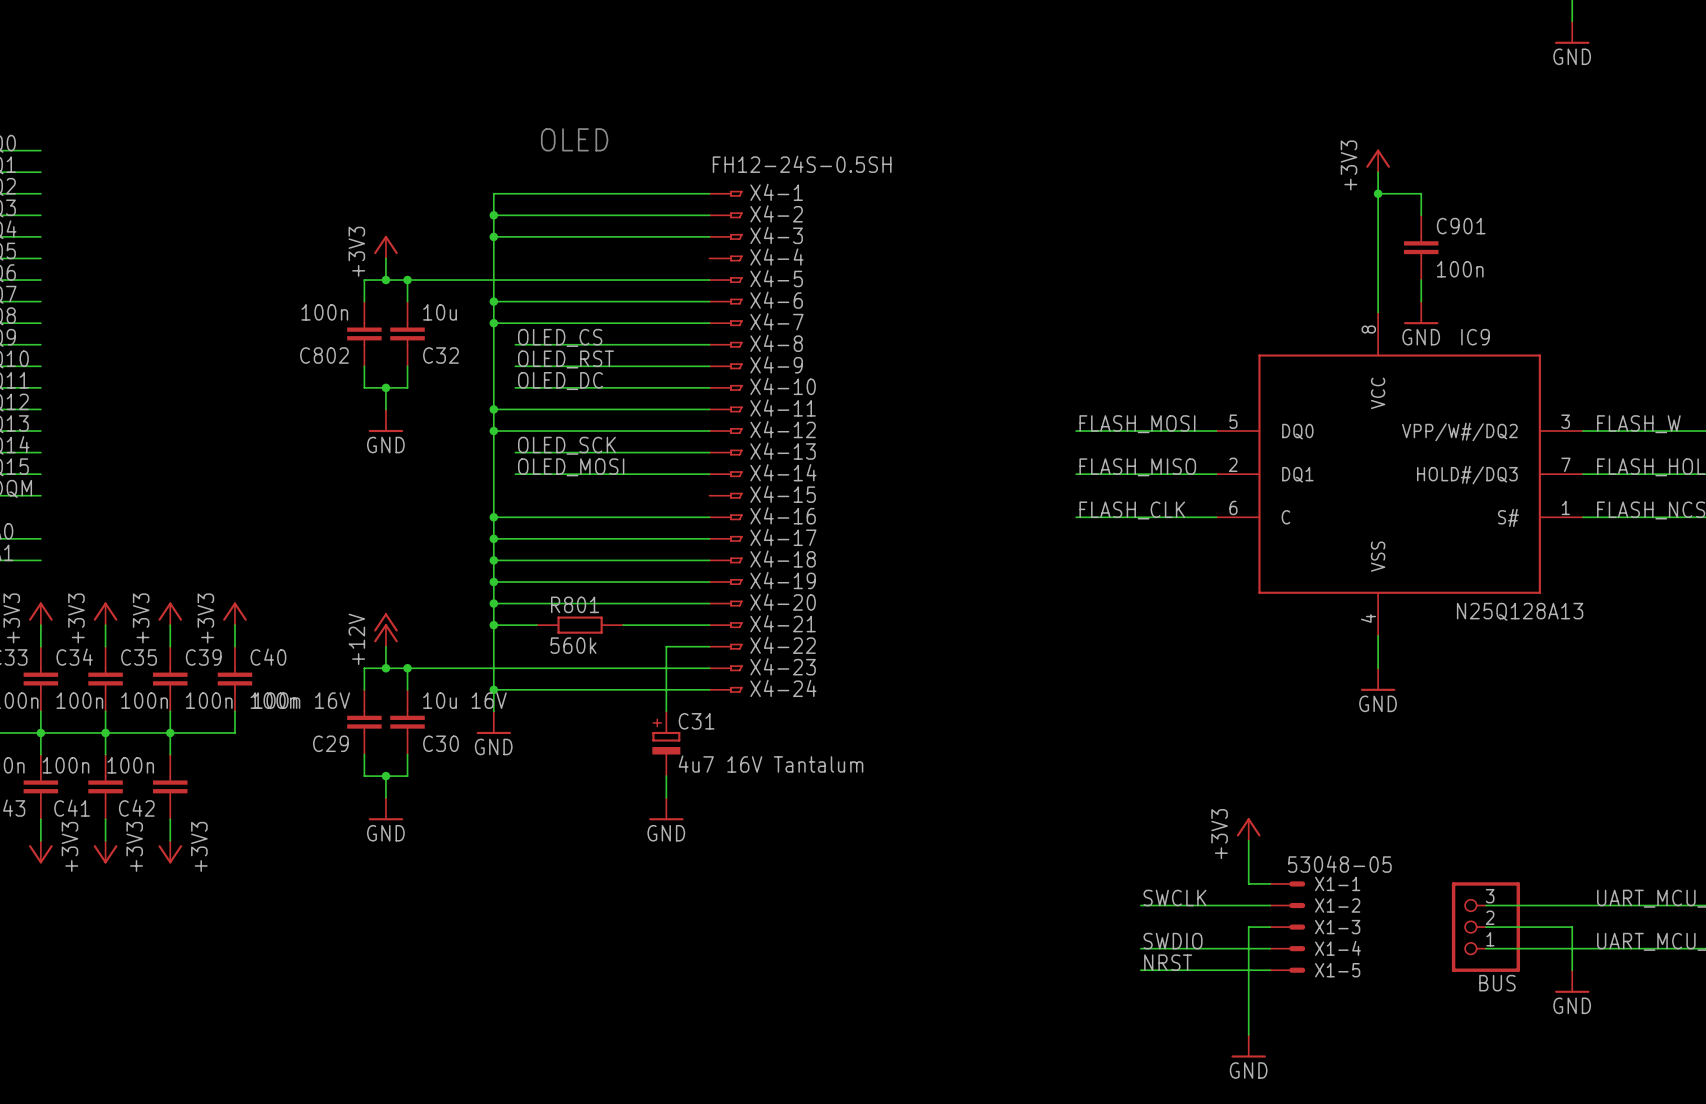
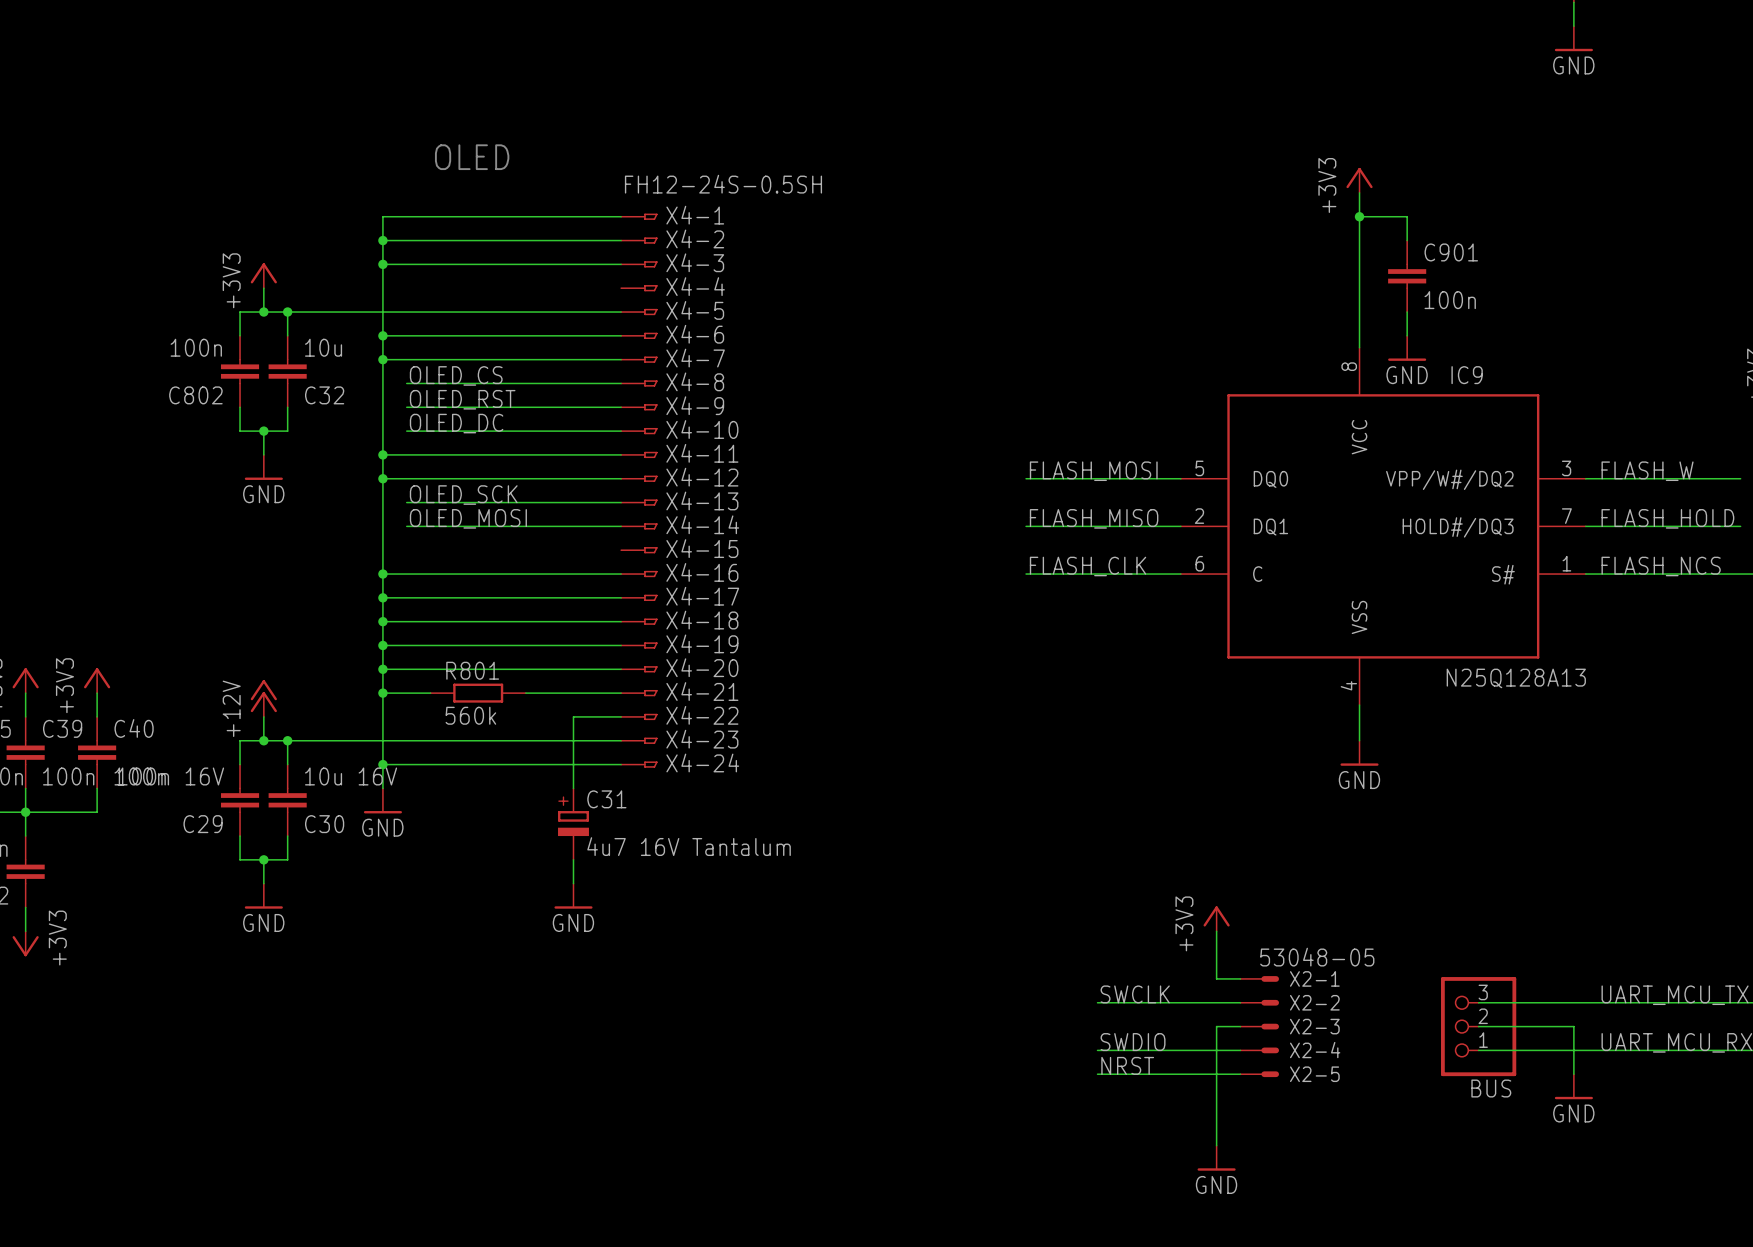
X1-1 name: X1-1 (1337, 883) -> X2-1 (1314, 978)
X1-2 name: X1-2 (1337, 905) -> X2-2 (1314, 1002)
X1-3 name: X1-3 (1337, 927) -> X2-3 (1314, 1026)
X1-4 name: X1-4 (1337, 948) -> X2-4 (1315, 1050)
X1-5 name: X1-5 (1337, 970) -> X2-5 (1314, 1074)

